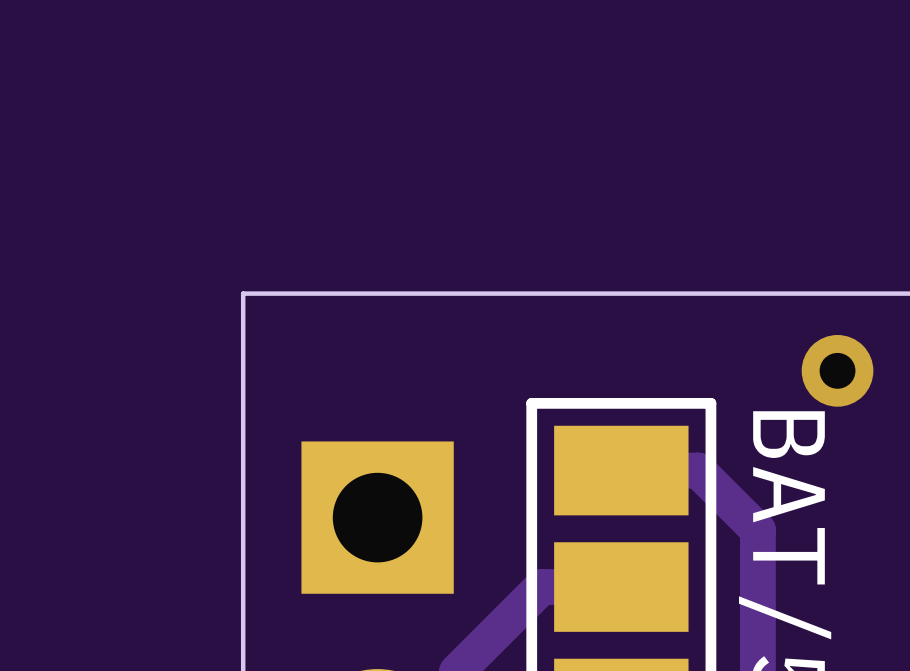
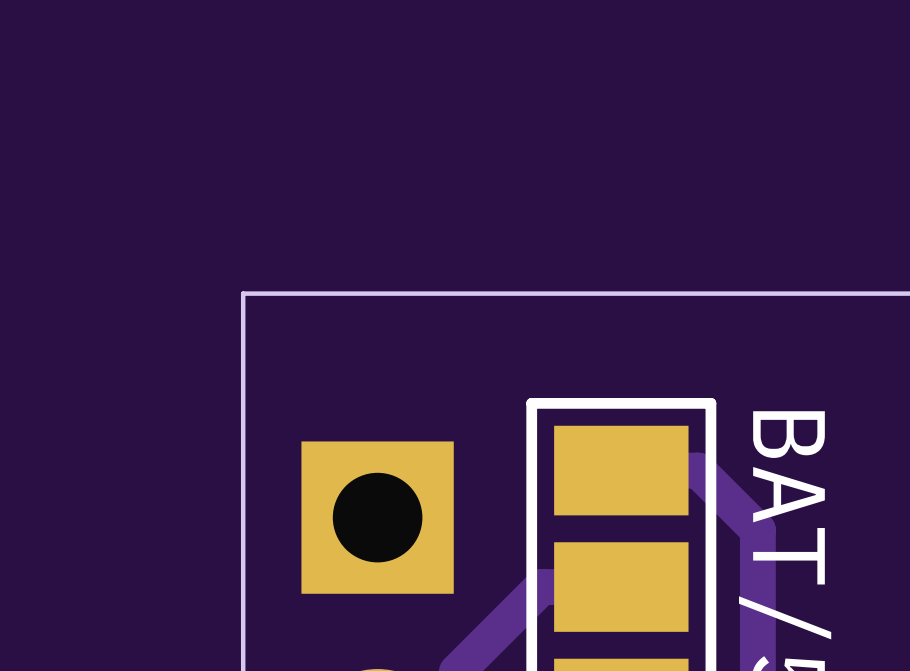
via: (837, 370) -> none

